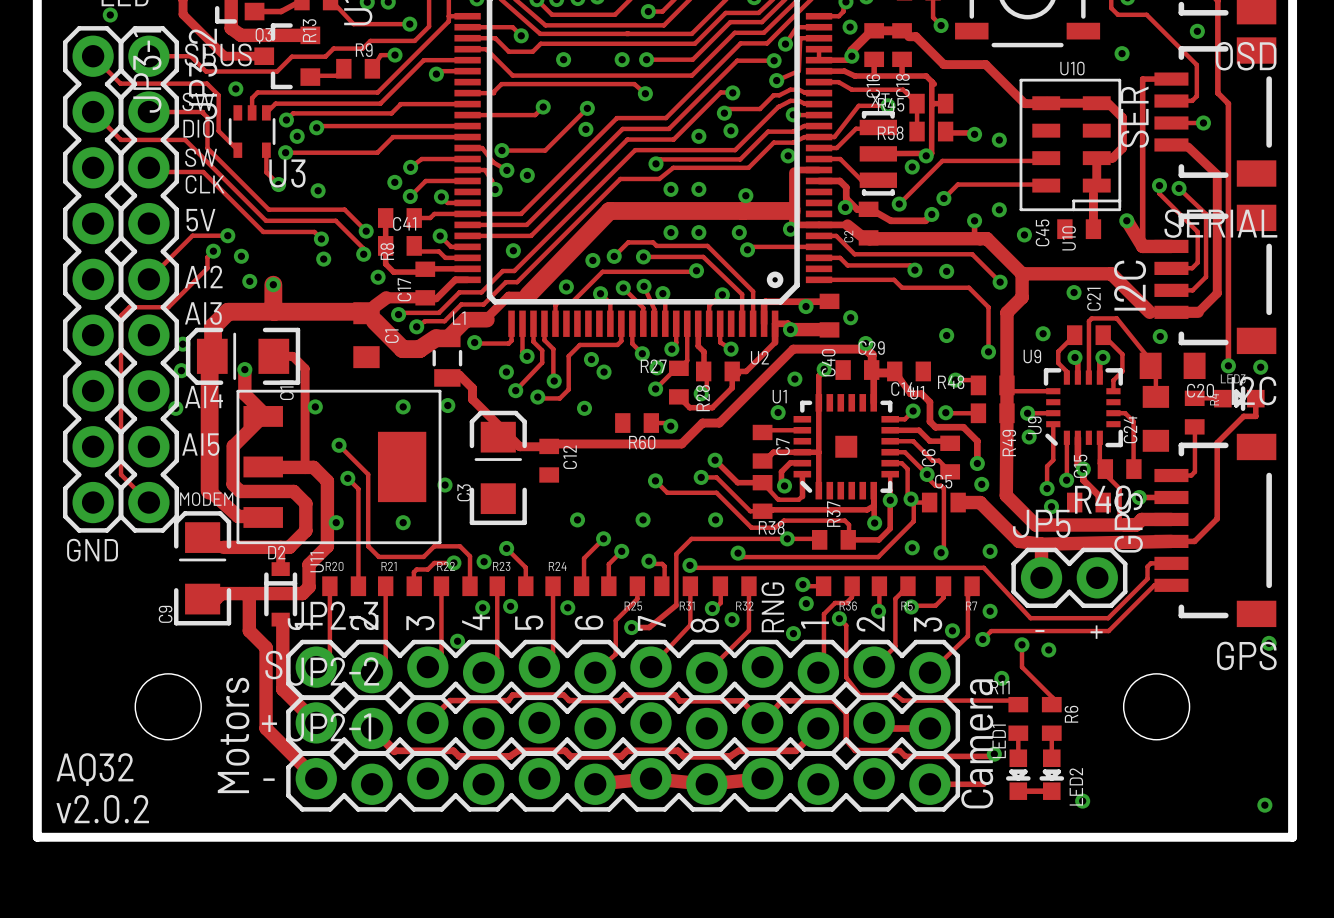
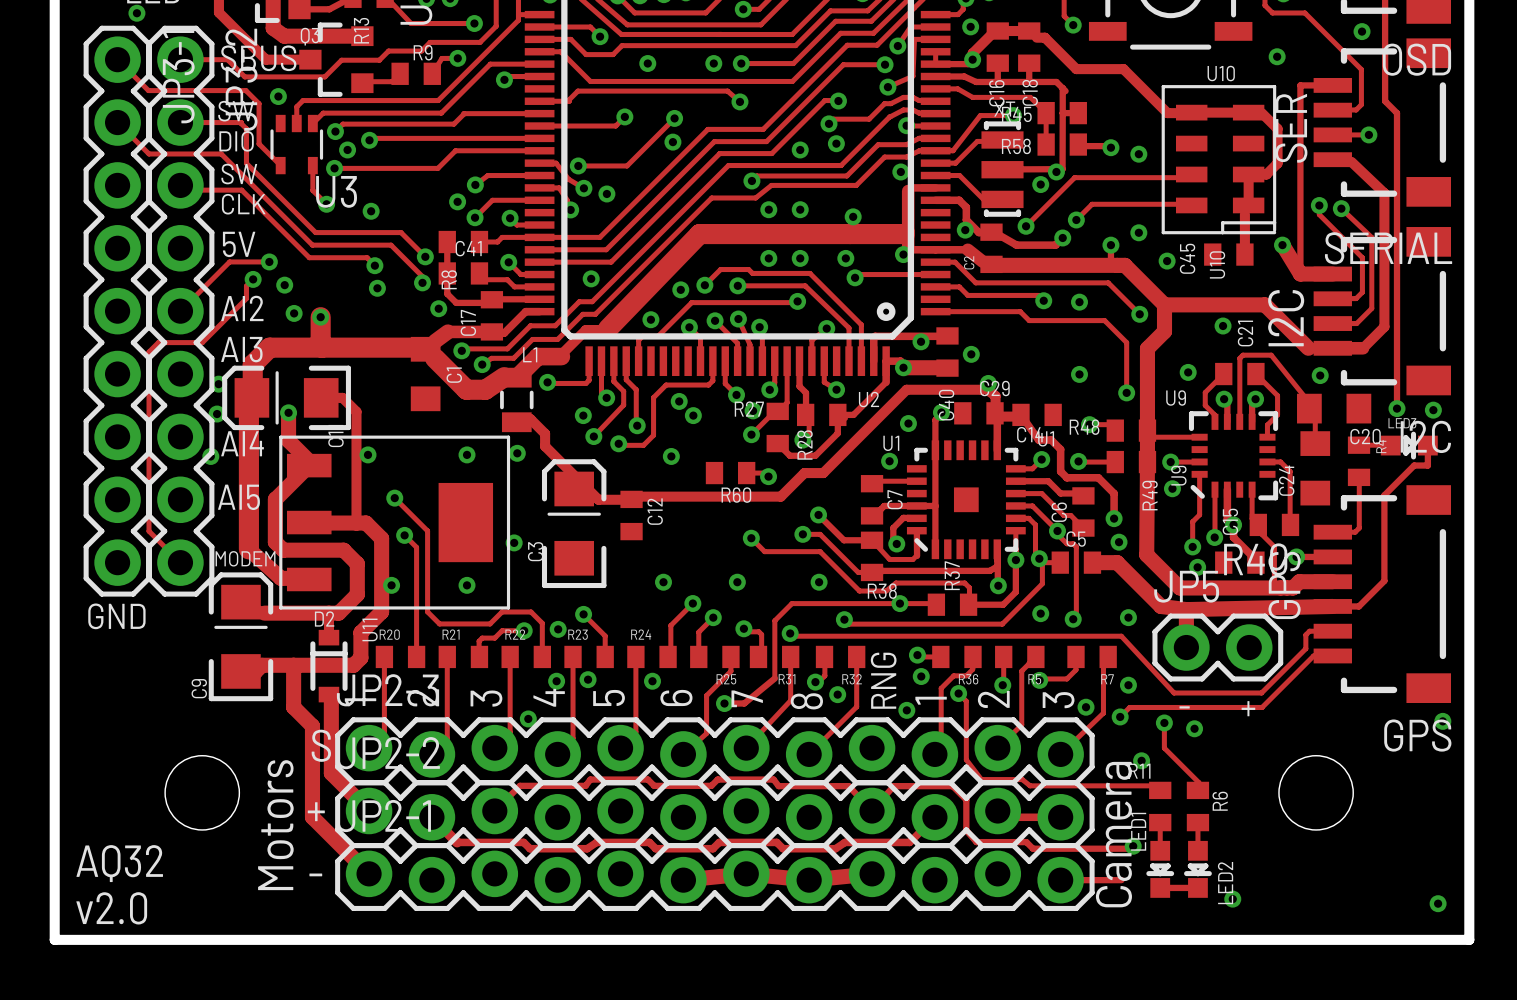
text: v2.0.2 (102, 809) -> v2.0 (111, 908)

